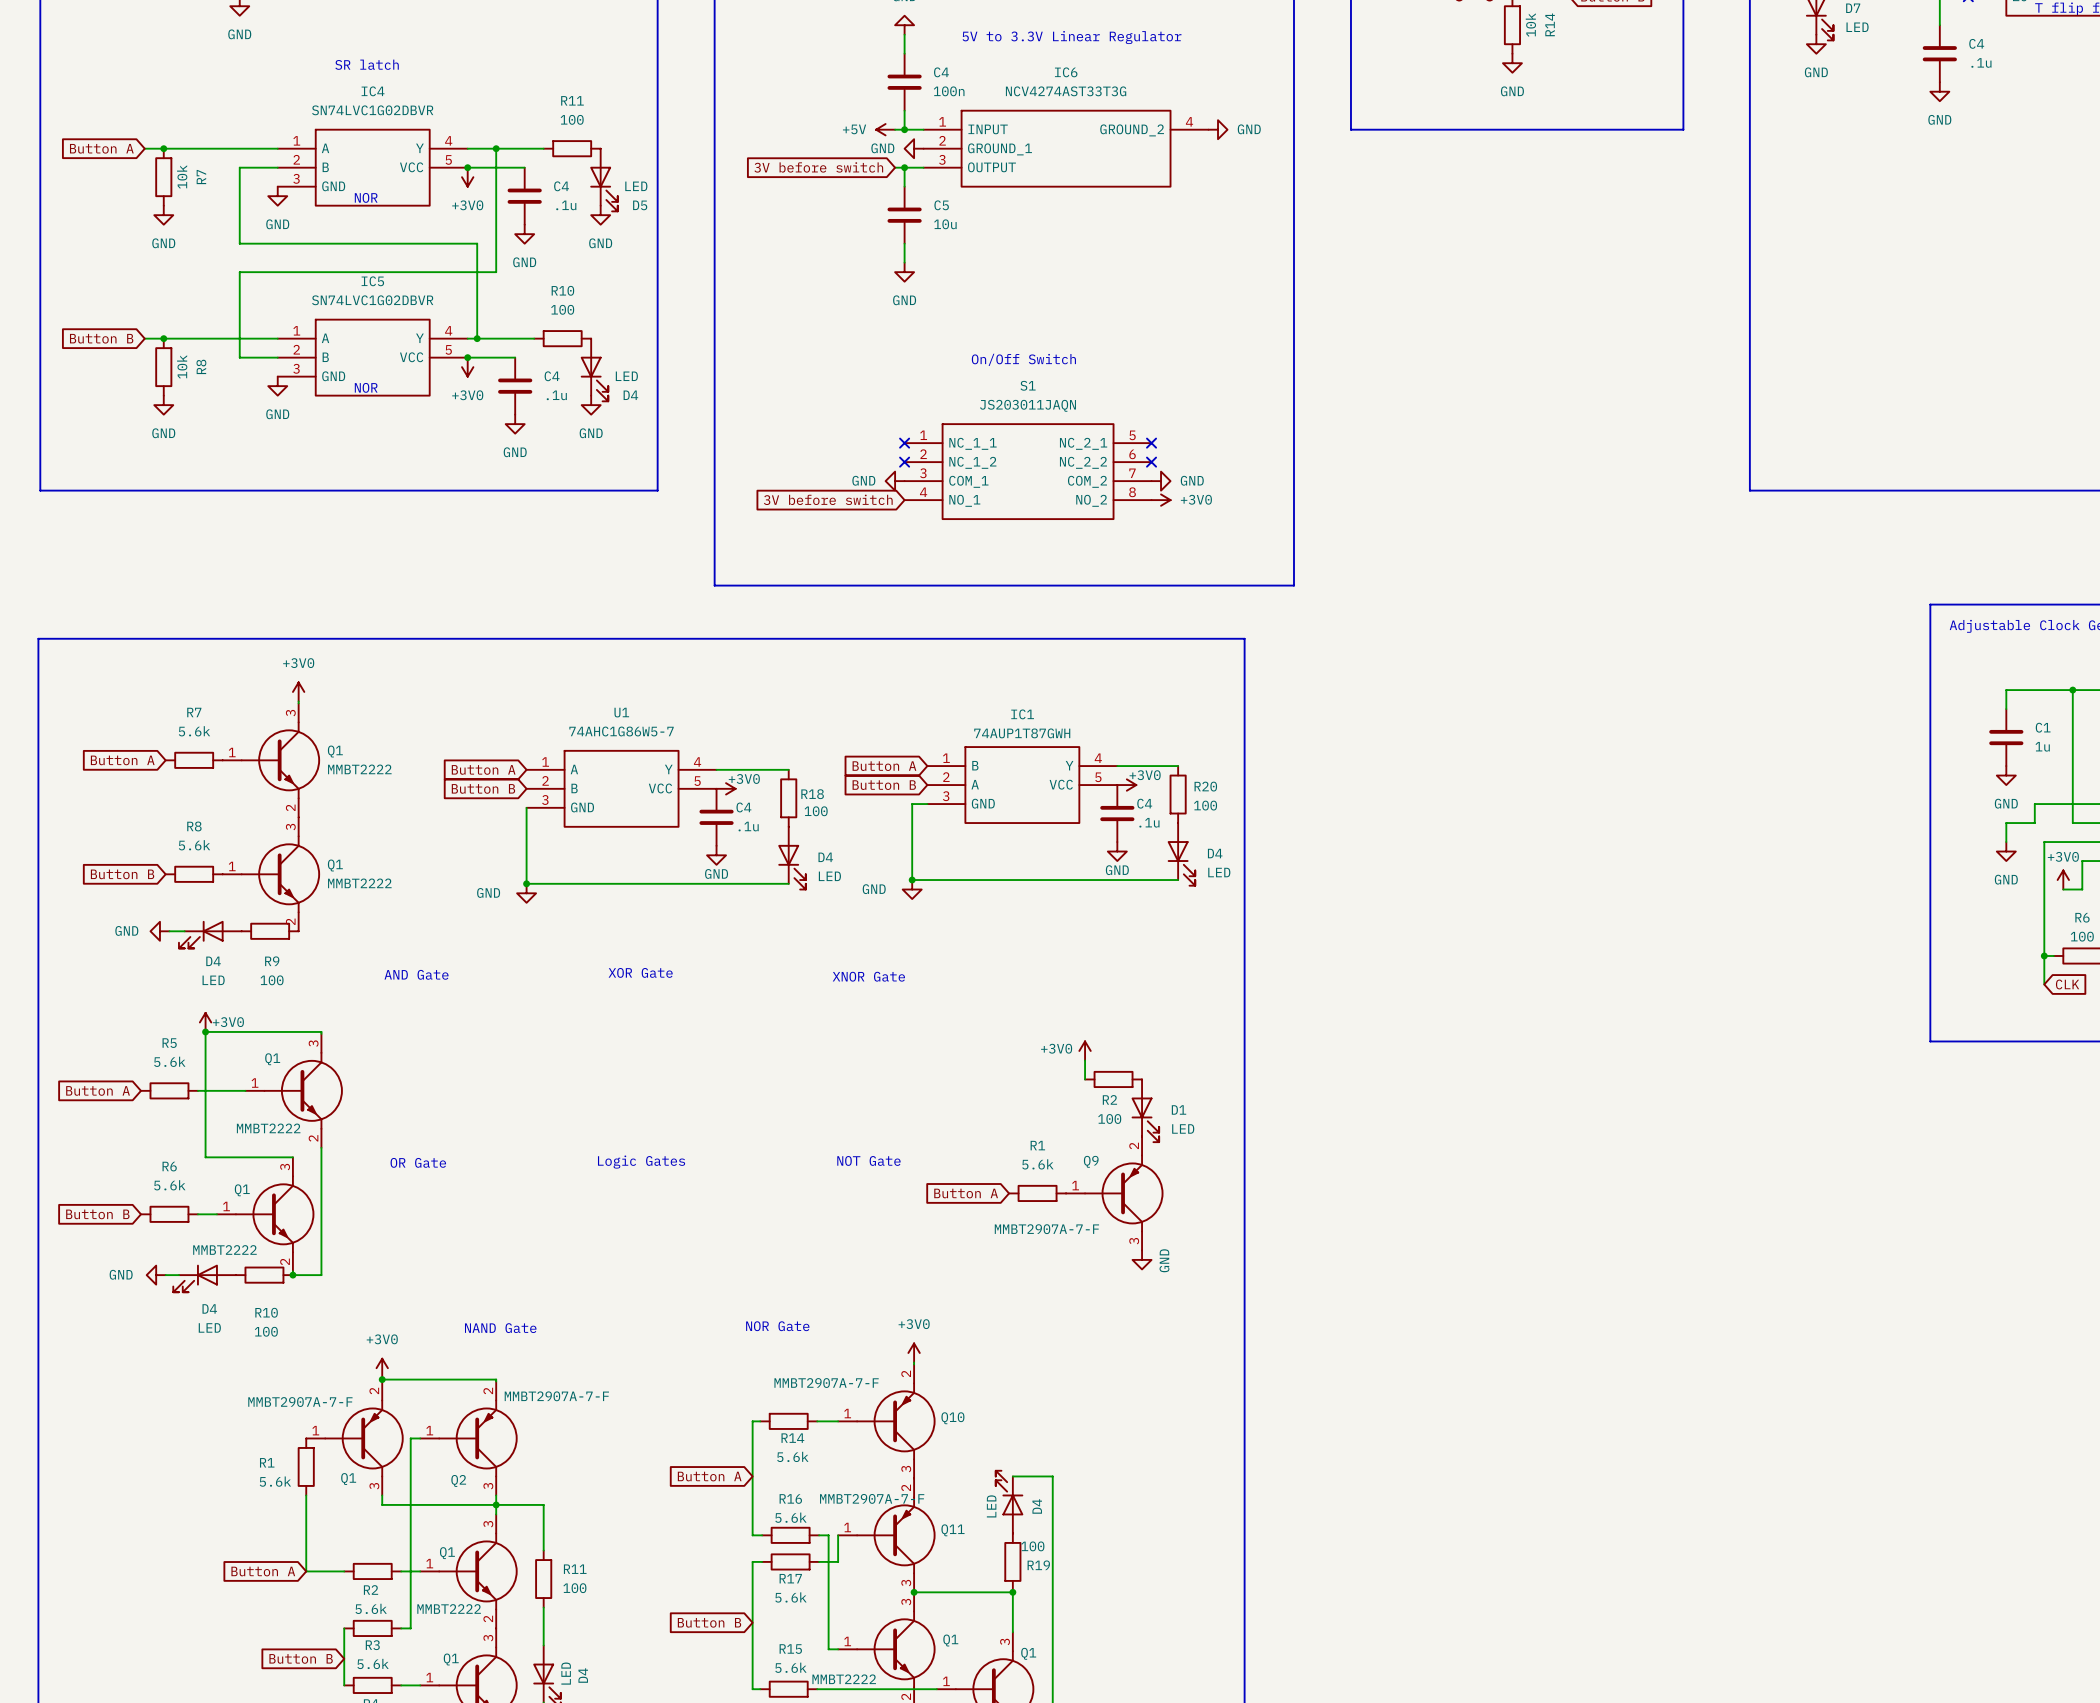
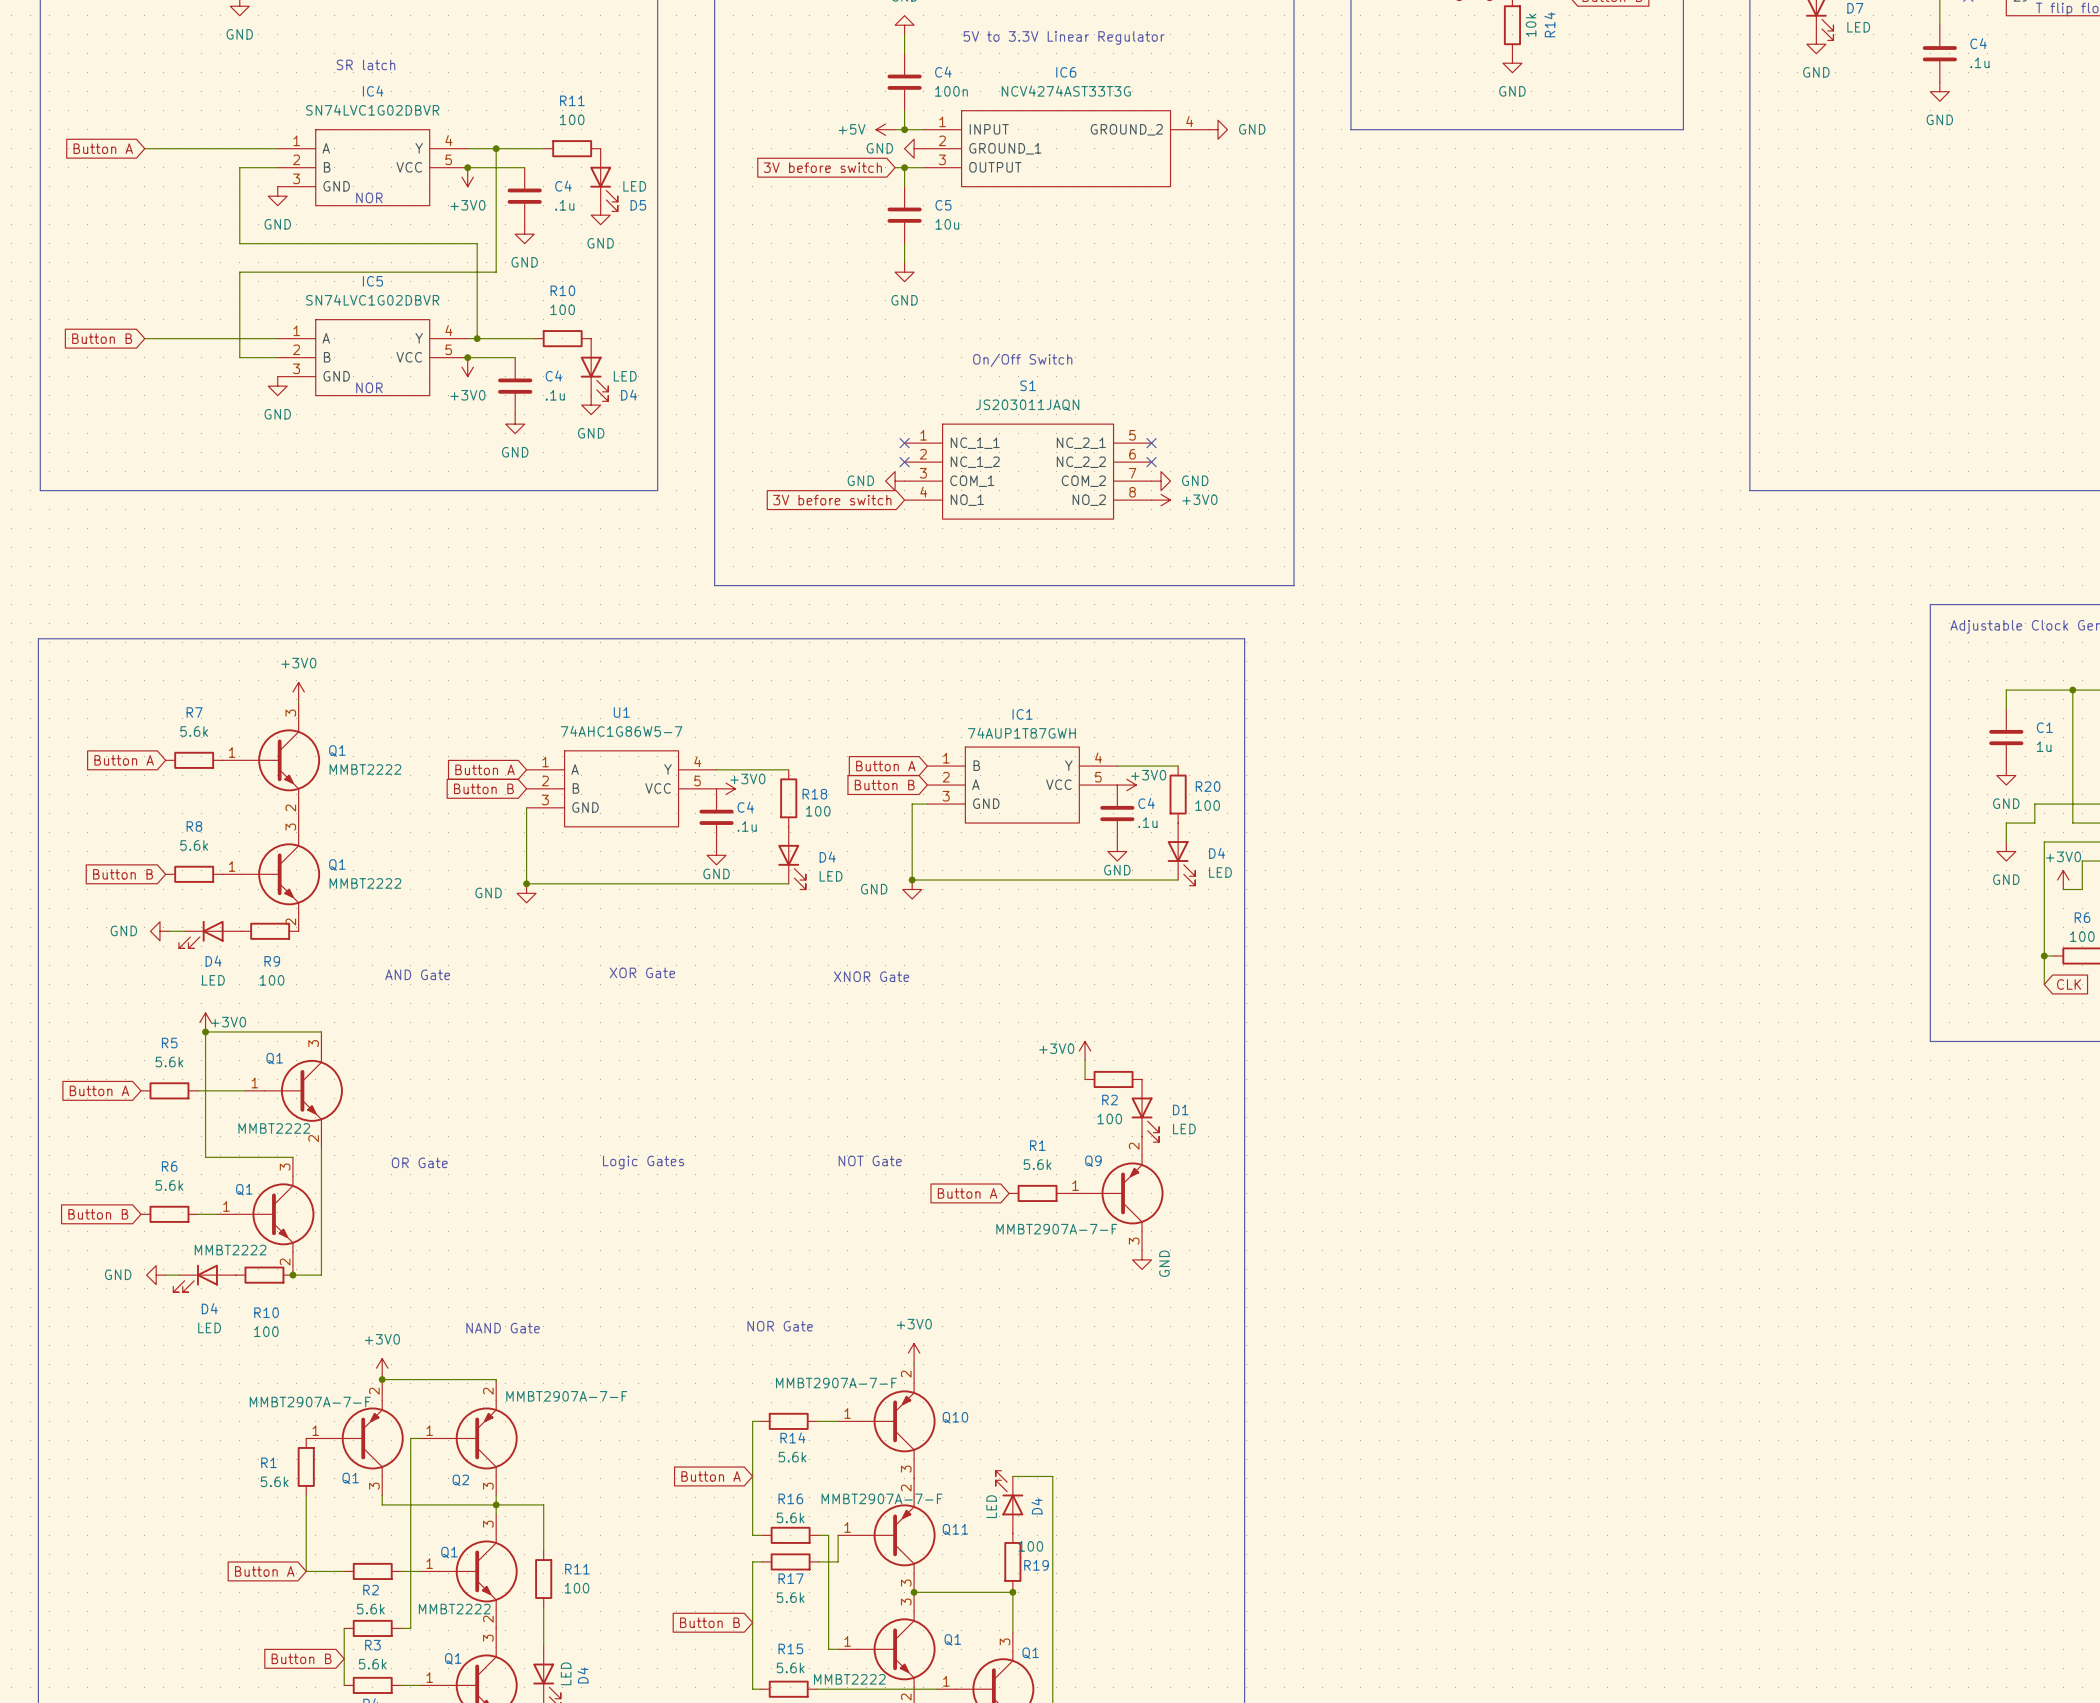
junction: (163, 148) -> none
R7: 10k (163, 177) -> none
power symbol: GND (163, 215) -> none
junction: (163, 338) -> none
R8: 10k (163, 367) -> none
power symbol: GND (163, 405) -> none

